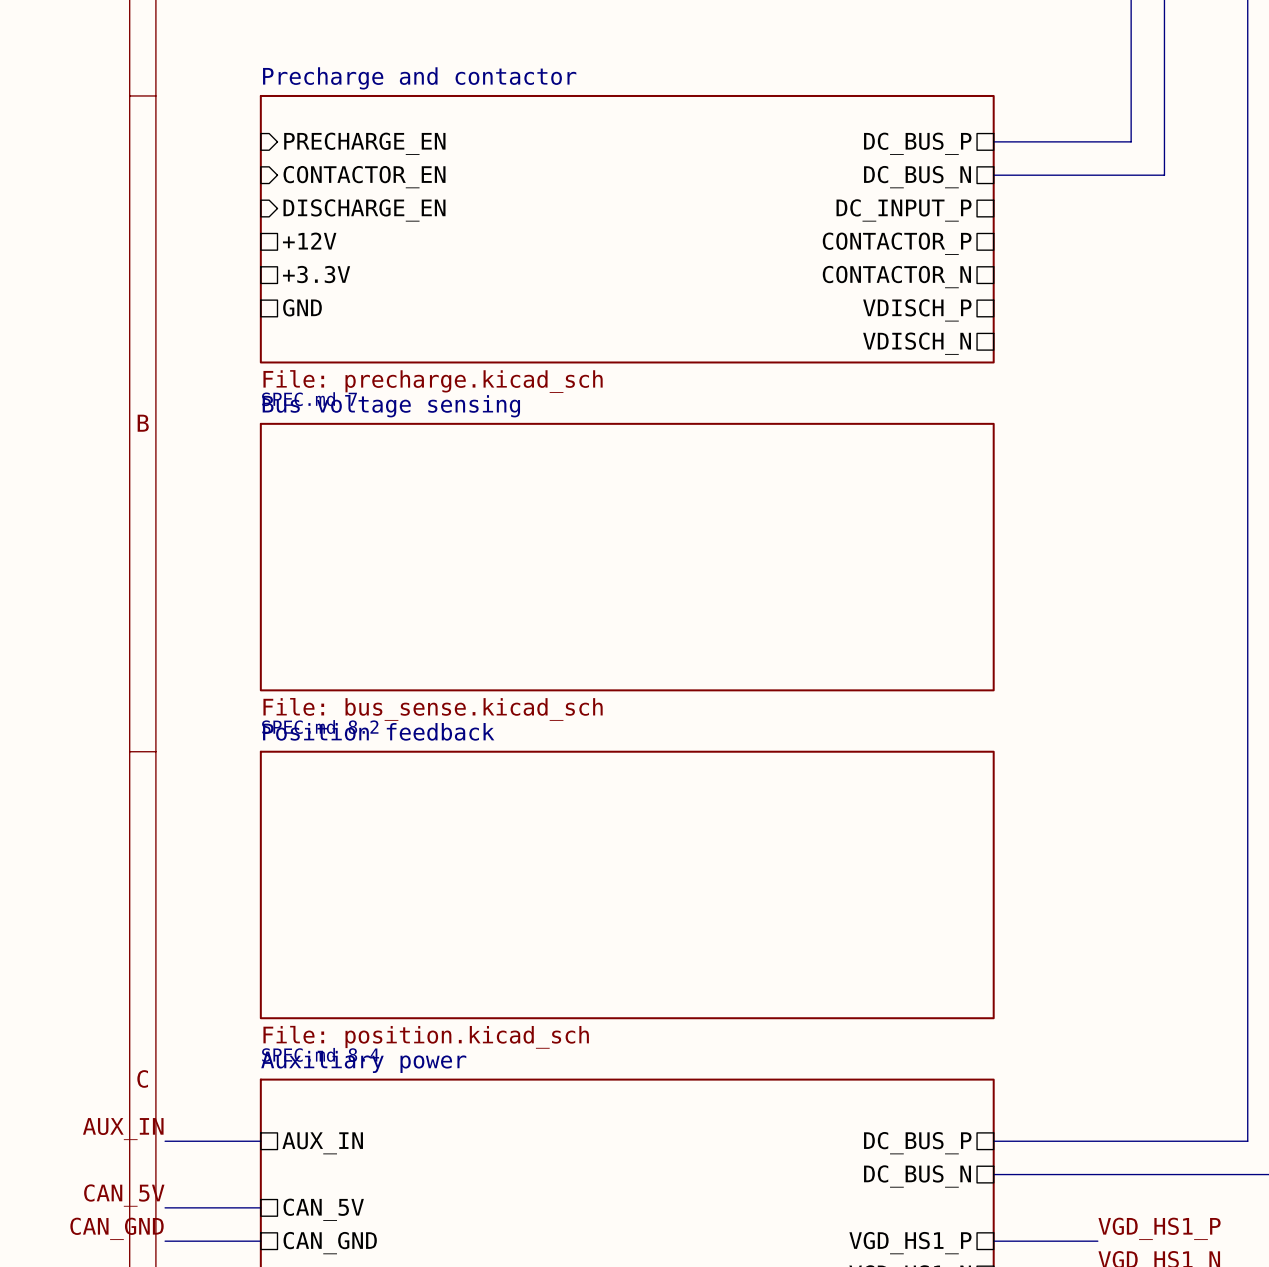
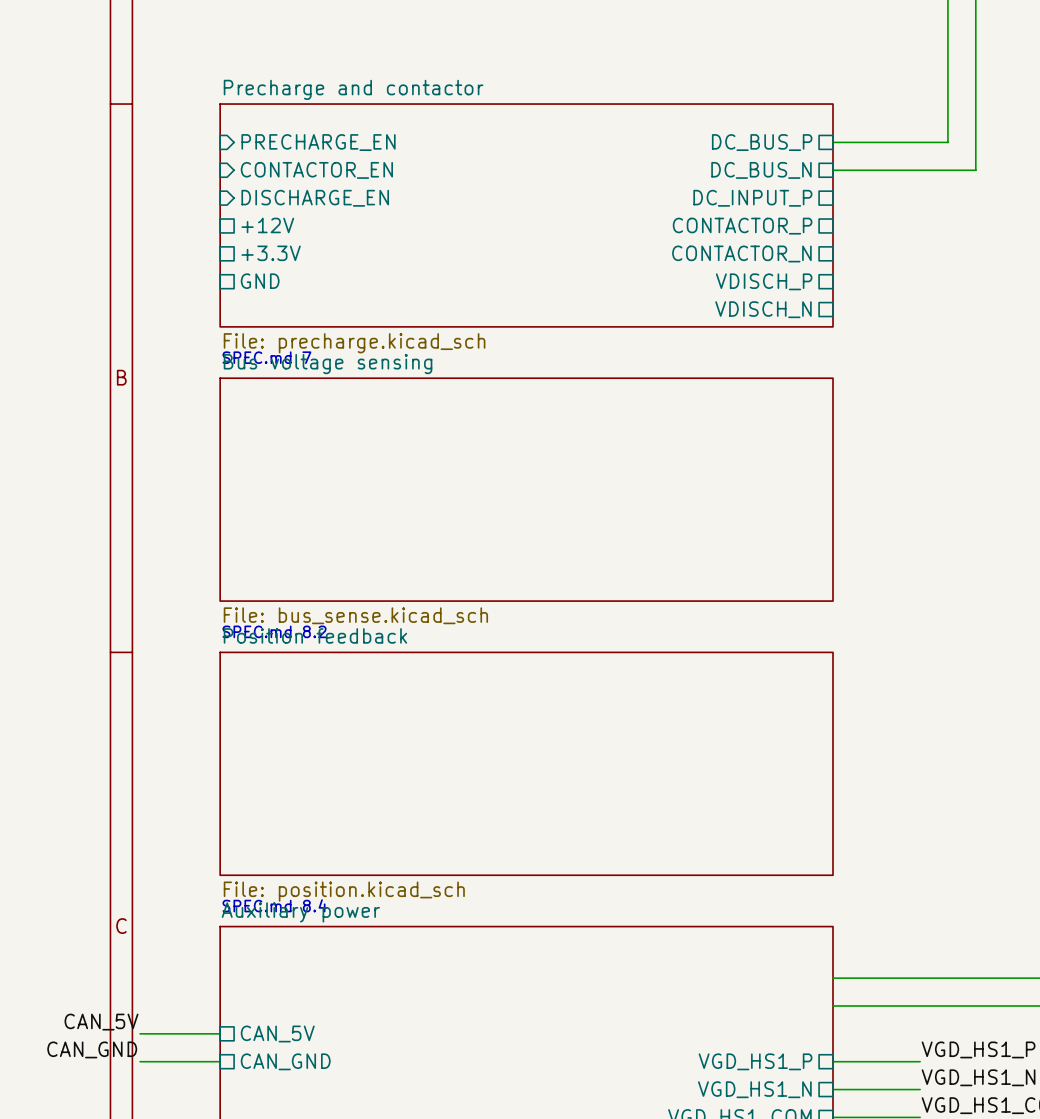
label: AUX_IN (123, 1129) -> none
wire: (165, 1141) (260, 1141) -> none
sheet pin: AUX_IN (322, 1143) -> none
sheet pin: DC_BUS_P (917, 1143) -> none
sheet pin: DC_BUS_N (917, 1176) -> none

